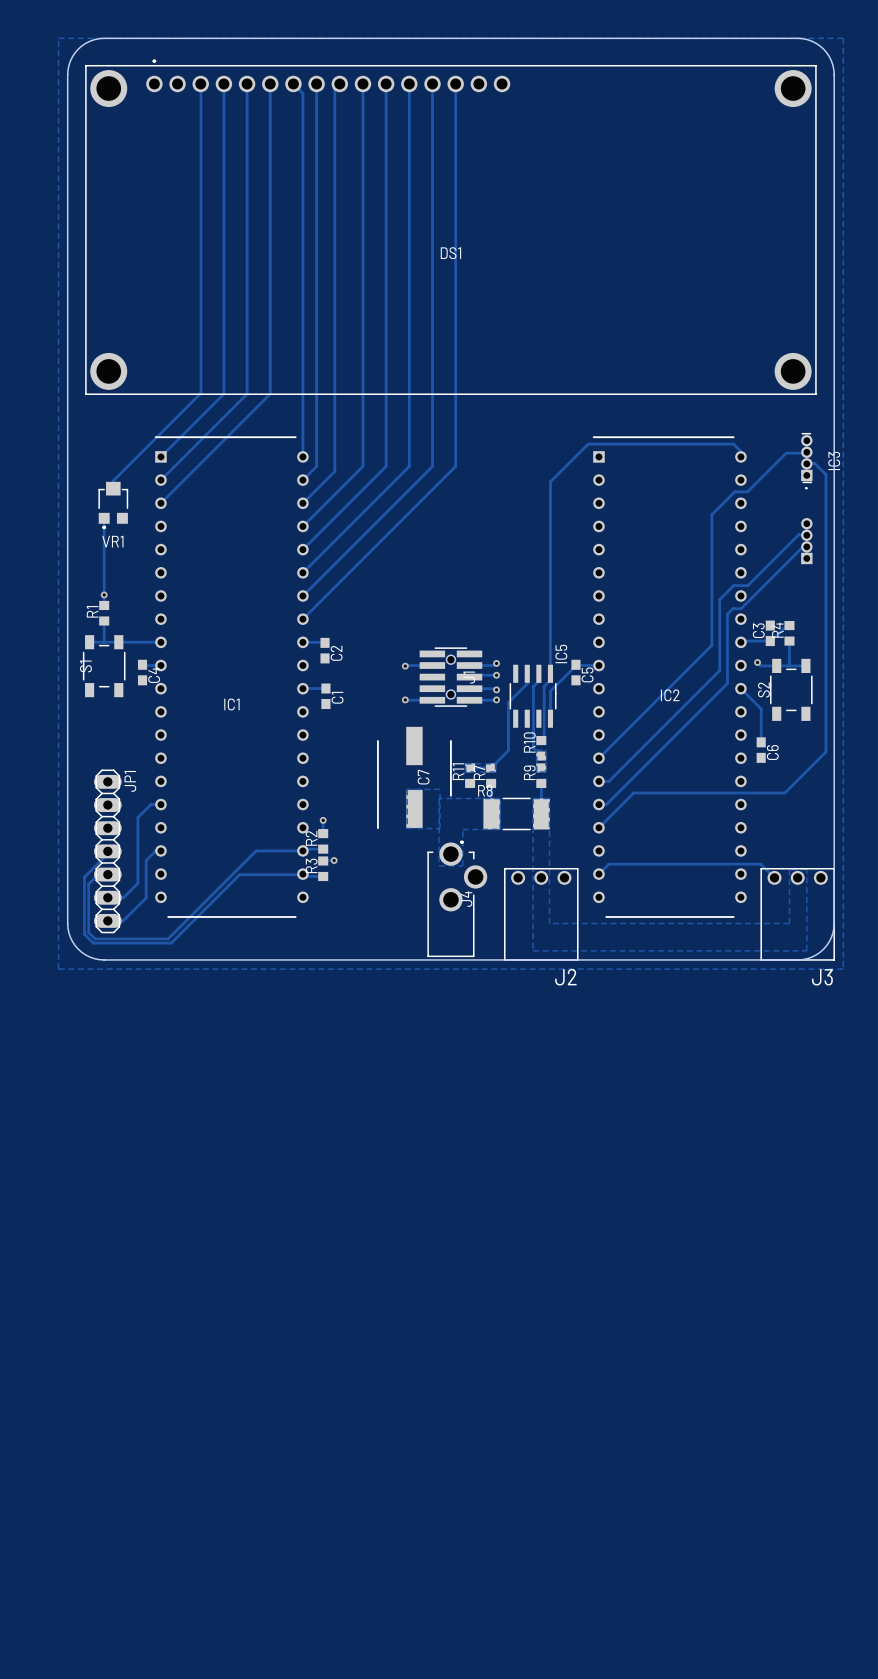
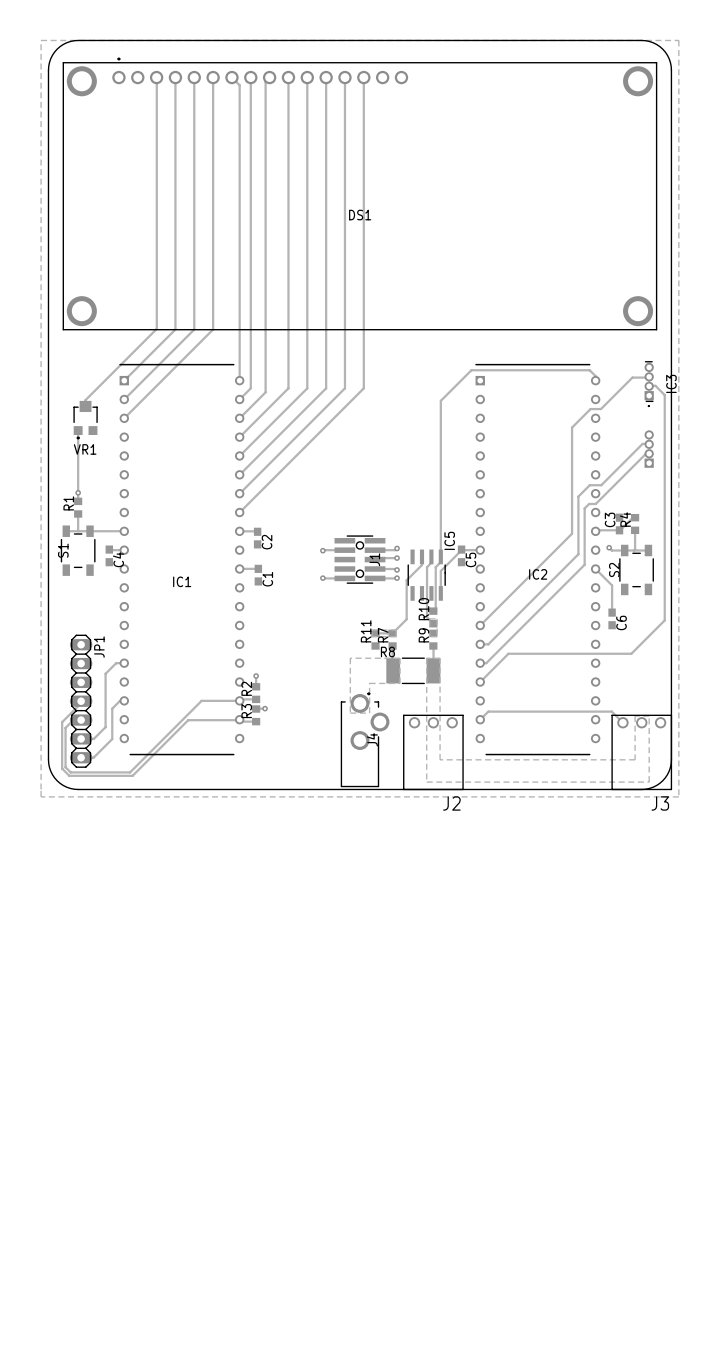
C7: (414, 777) -> none
zone outline: (407, 789) (439, 789) (439, 828) (407, 828) (407, 789) -> none

